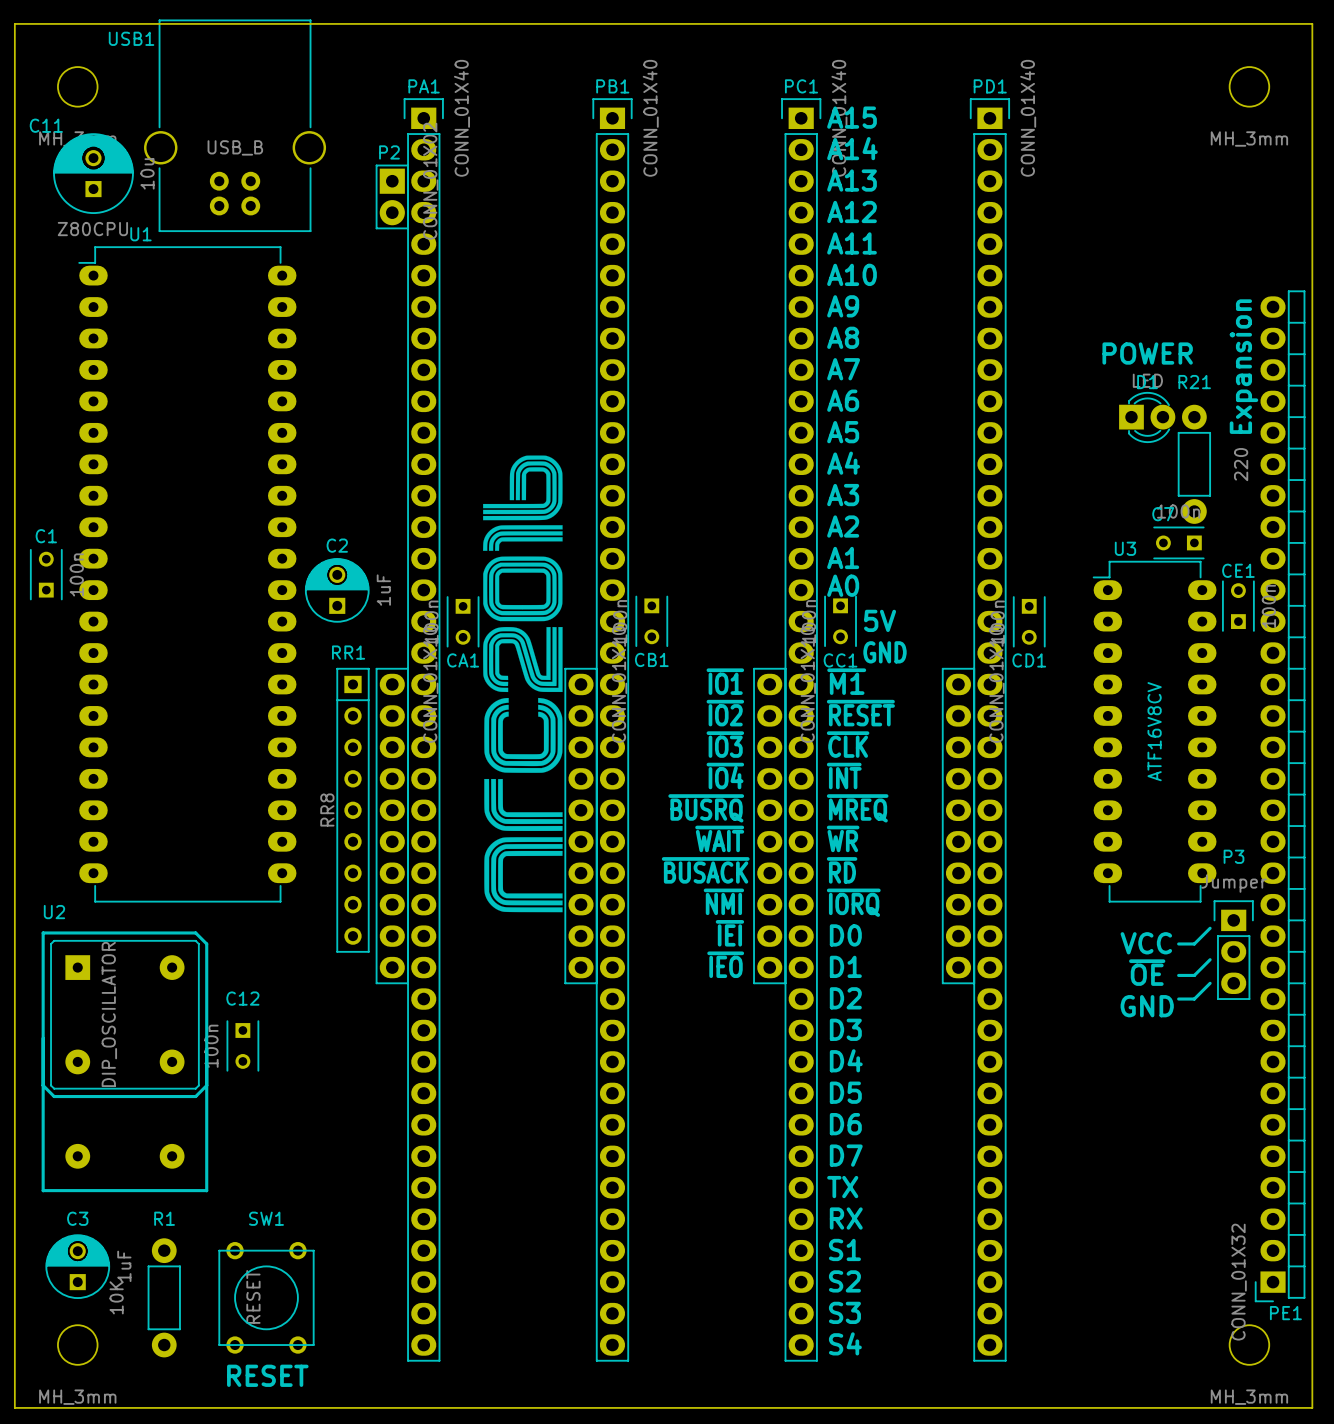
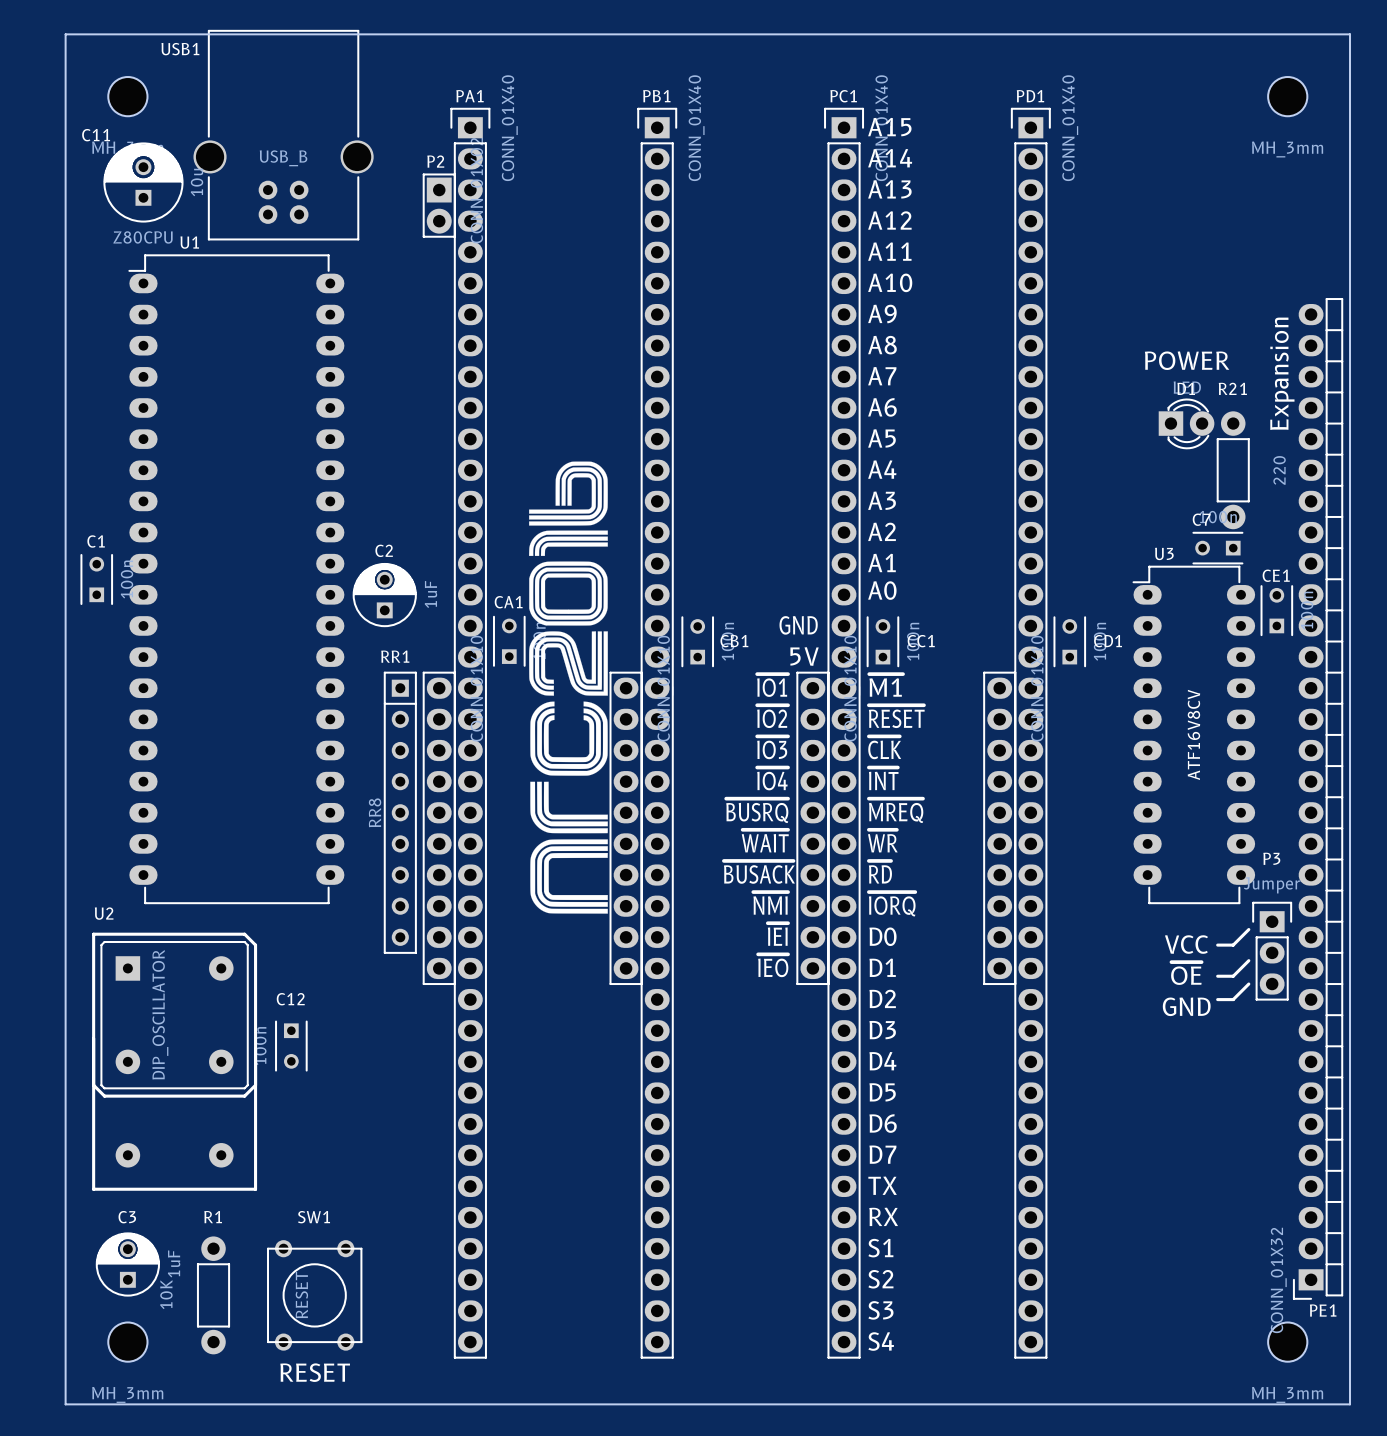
text position: 5V (880, 620) -> 5V (804, 656)
CA1 rotation: 0° (463, 621) -> 180° (509, 641)
CB1 rotation: 0° (651, 621) -> 180° (697, 641)
CC1 rotation: 0° (840, 621) -> 180° (882, 641)
CD1 rotation: 0° (1029, 621) -> 180° (1069, 641)
text position: GND (884, 652) -> GND (798, 625)
CB1 name position: CB1 (651, 659) -> CB1 (734, 641)
CC1 name position: CC1 (840, 660) -> CC1 (921, 641)
CD1 name position: CD1 (1029, 660) -> CD1 (1108, 641)

